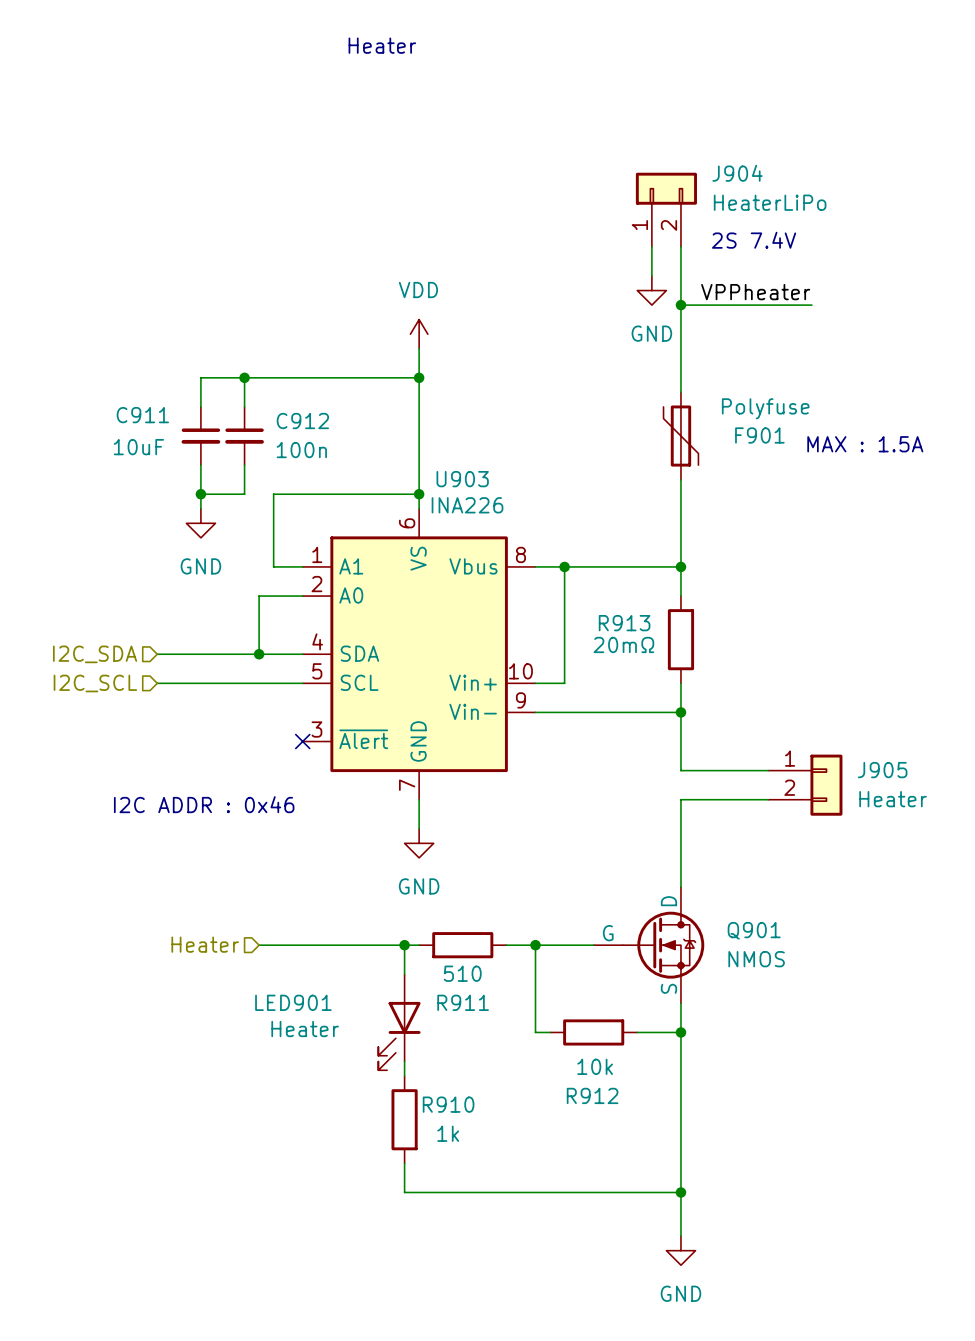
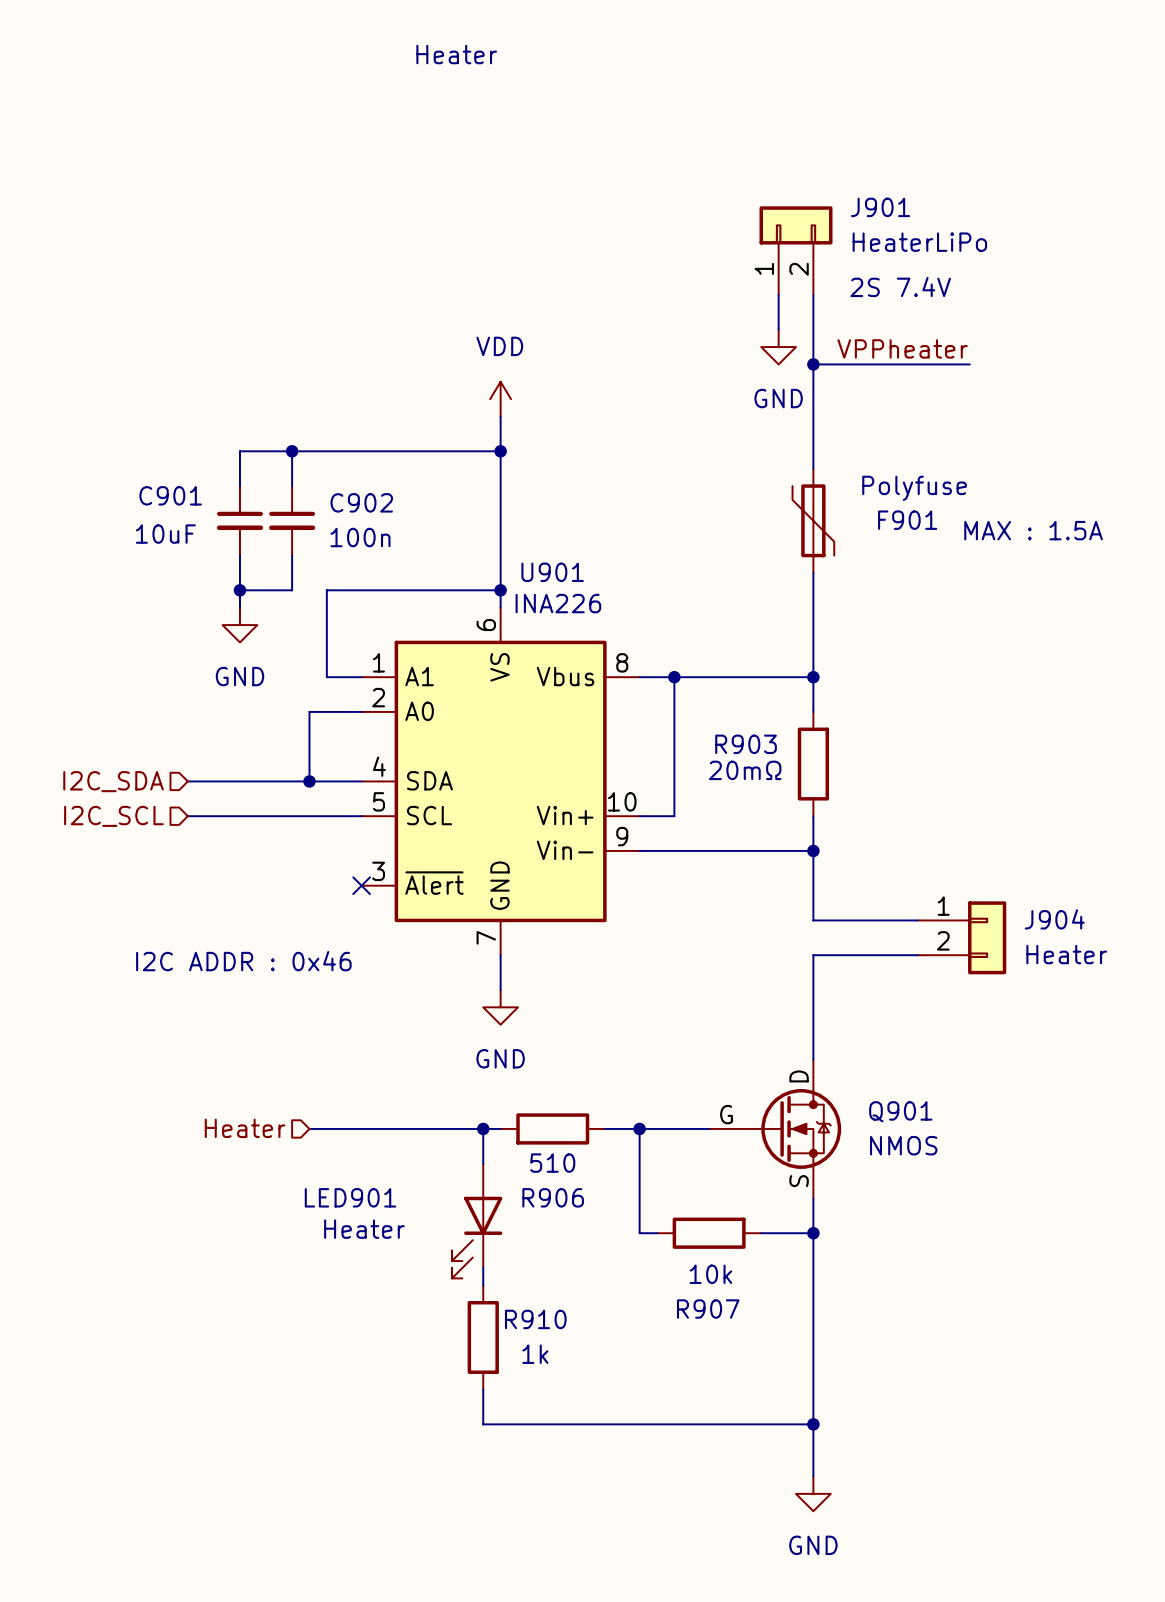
J904 name: J904 (737, 173) -> J901 (880, 207)
C911 name: C911 (142, 415) -> C901 (170, 495)
C912 name: C912 (302, 421) -> C902 (361, 502)
U903 name: U903 (462, 479) -> U901 (552, 572)
R913 name: R913 (624, 623) -> R903 (746, 744)
J905 name: J905 (882, 770) -> J904 (1054, 919)
R911 name: R911 (463, 1002) -> R906 (553, 1197)
R912 name: R912 (592, 1095) -> R907 (708, 1309)

